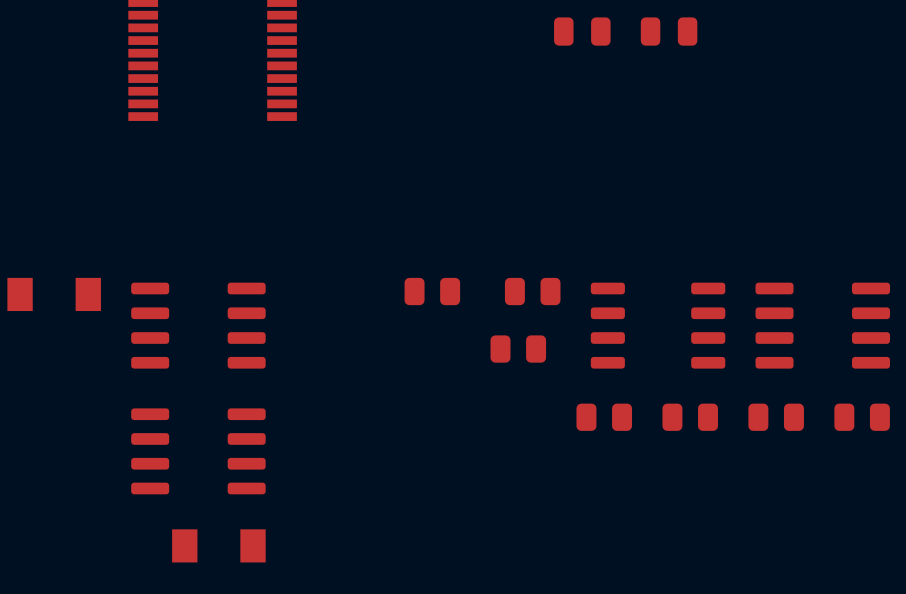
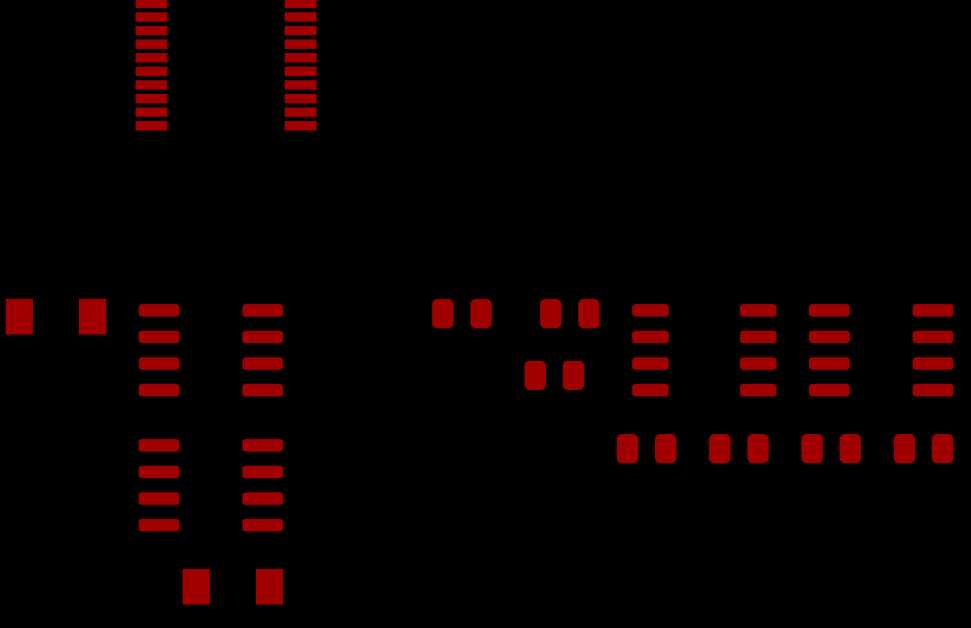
part: (582, 31) -> none
part: (669, 31) -> none

